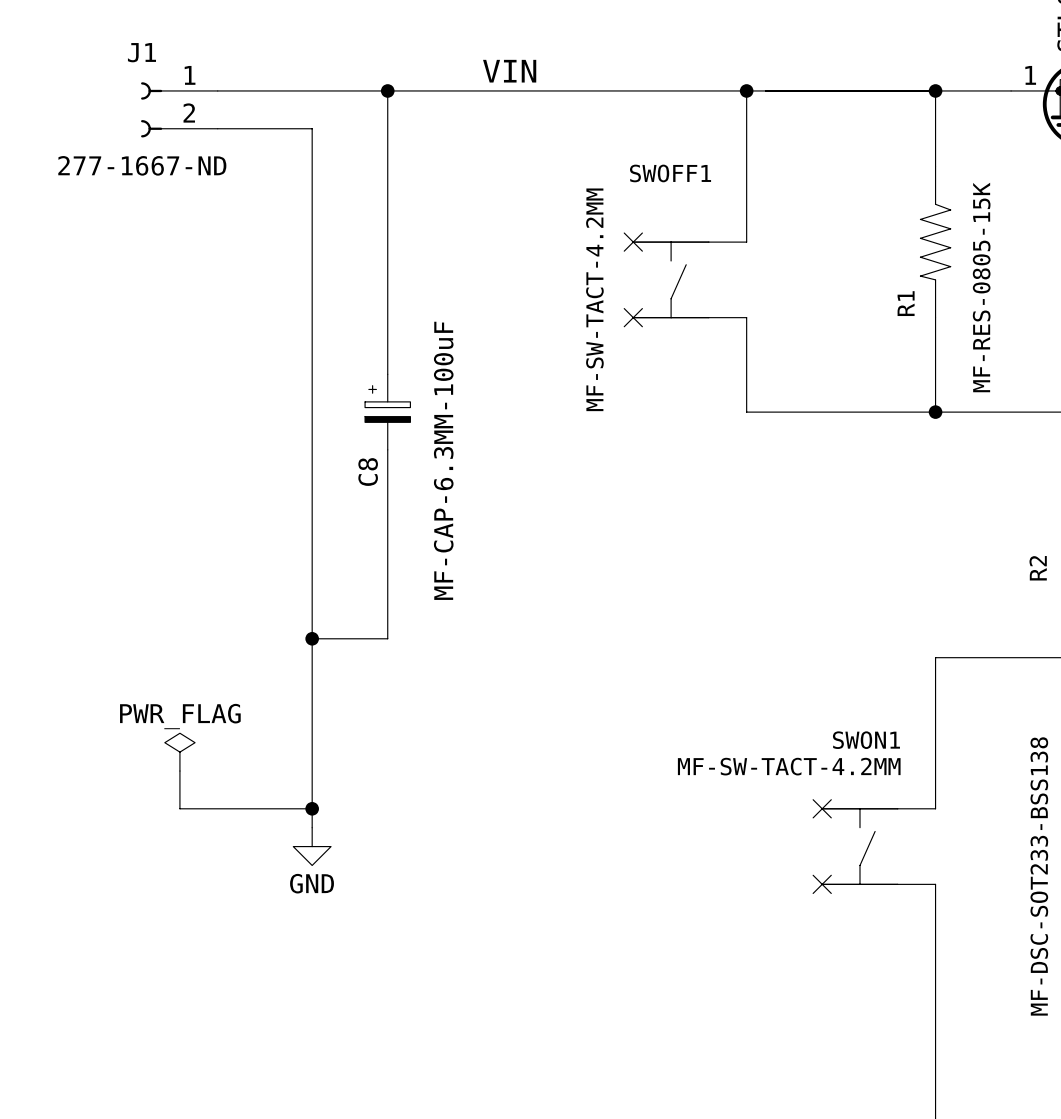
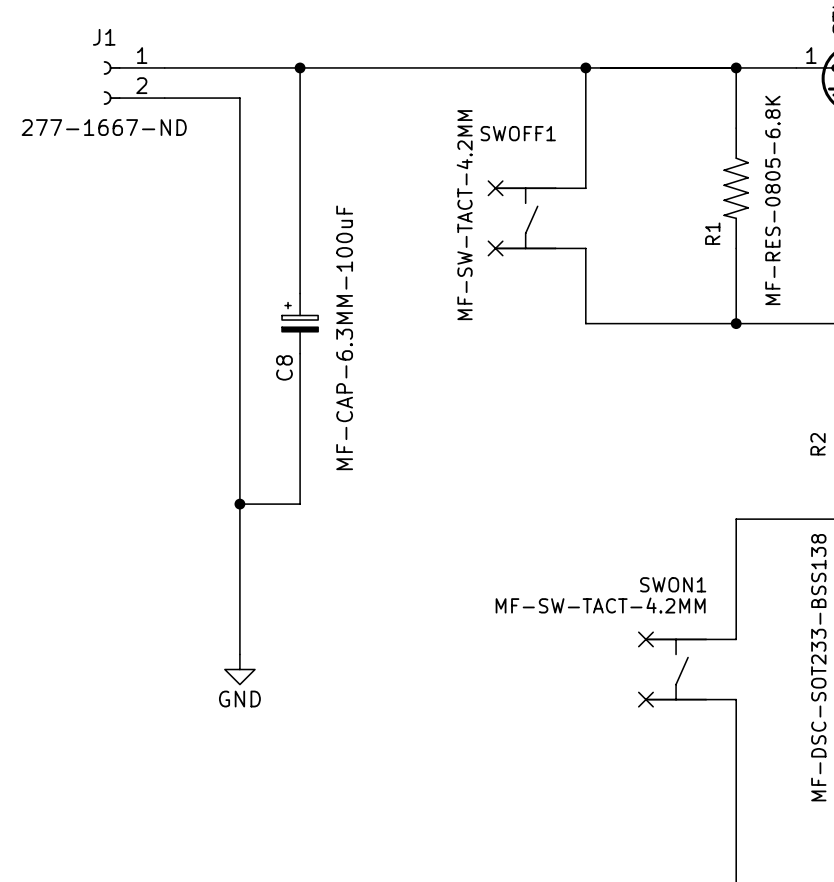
label: VIN (509, 71) -> none
R1 value: MF-RES-0805-15K (981, 287) -> MF-RES-0805-6.8K (772, 200)
power symbol: PWR_FLAG (179, 752) -> none
wire: (179, 771) (179, 808) (312, 808) -> none
junction: (312, 808) -> none

